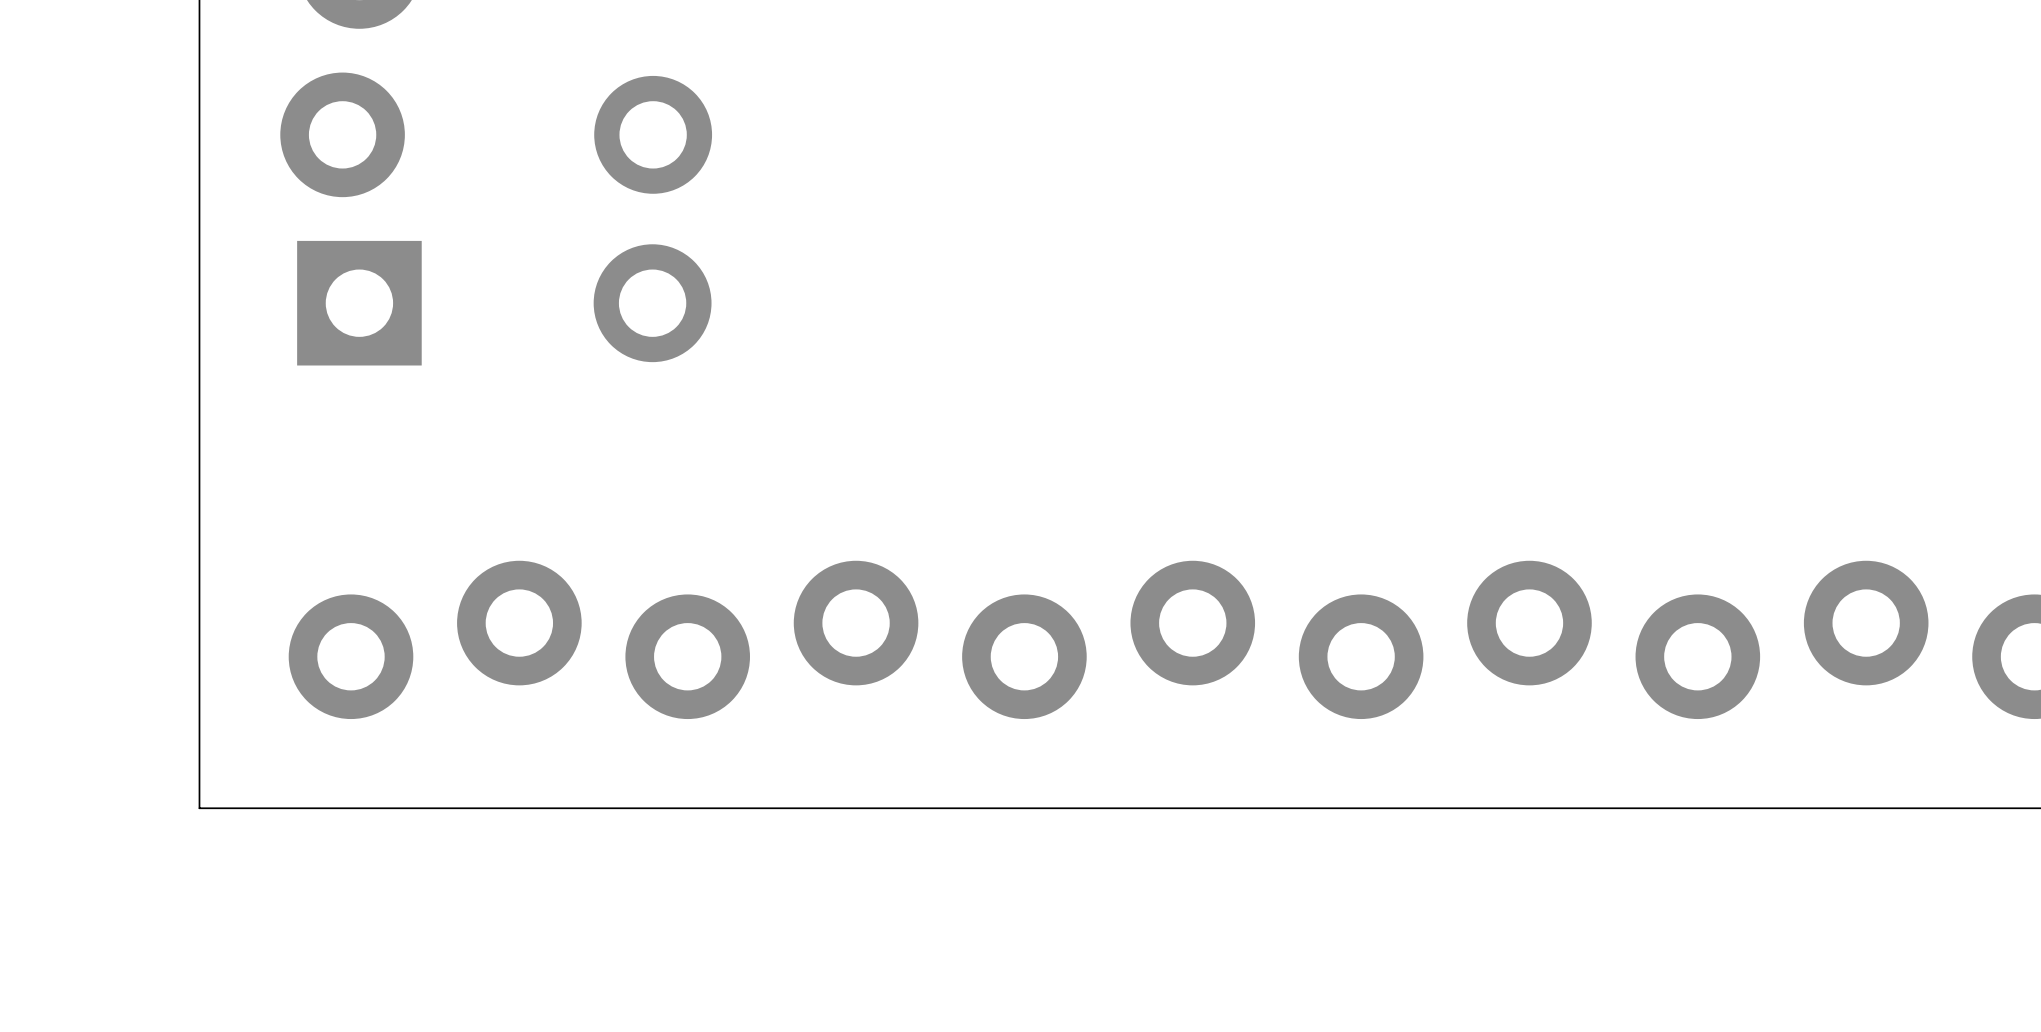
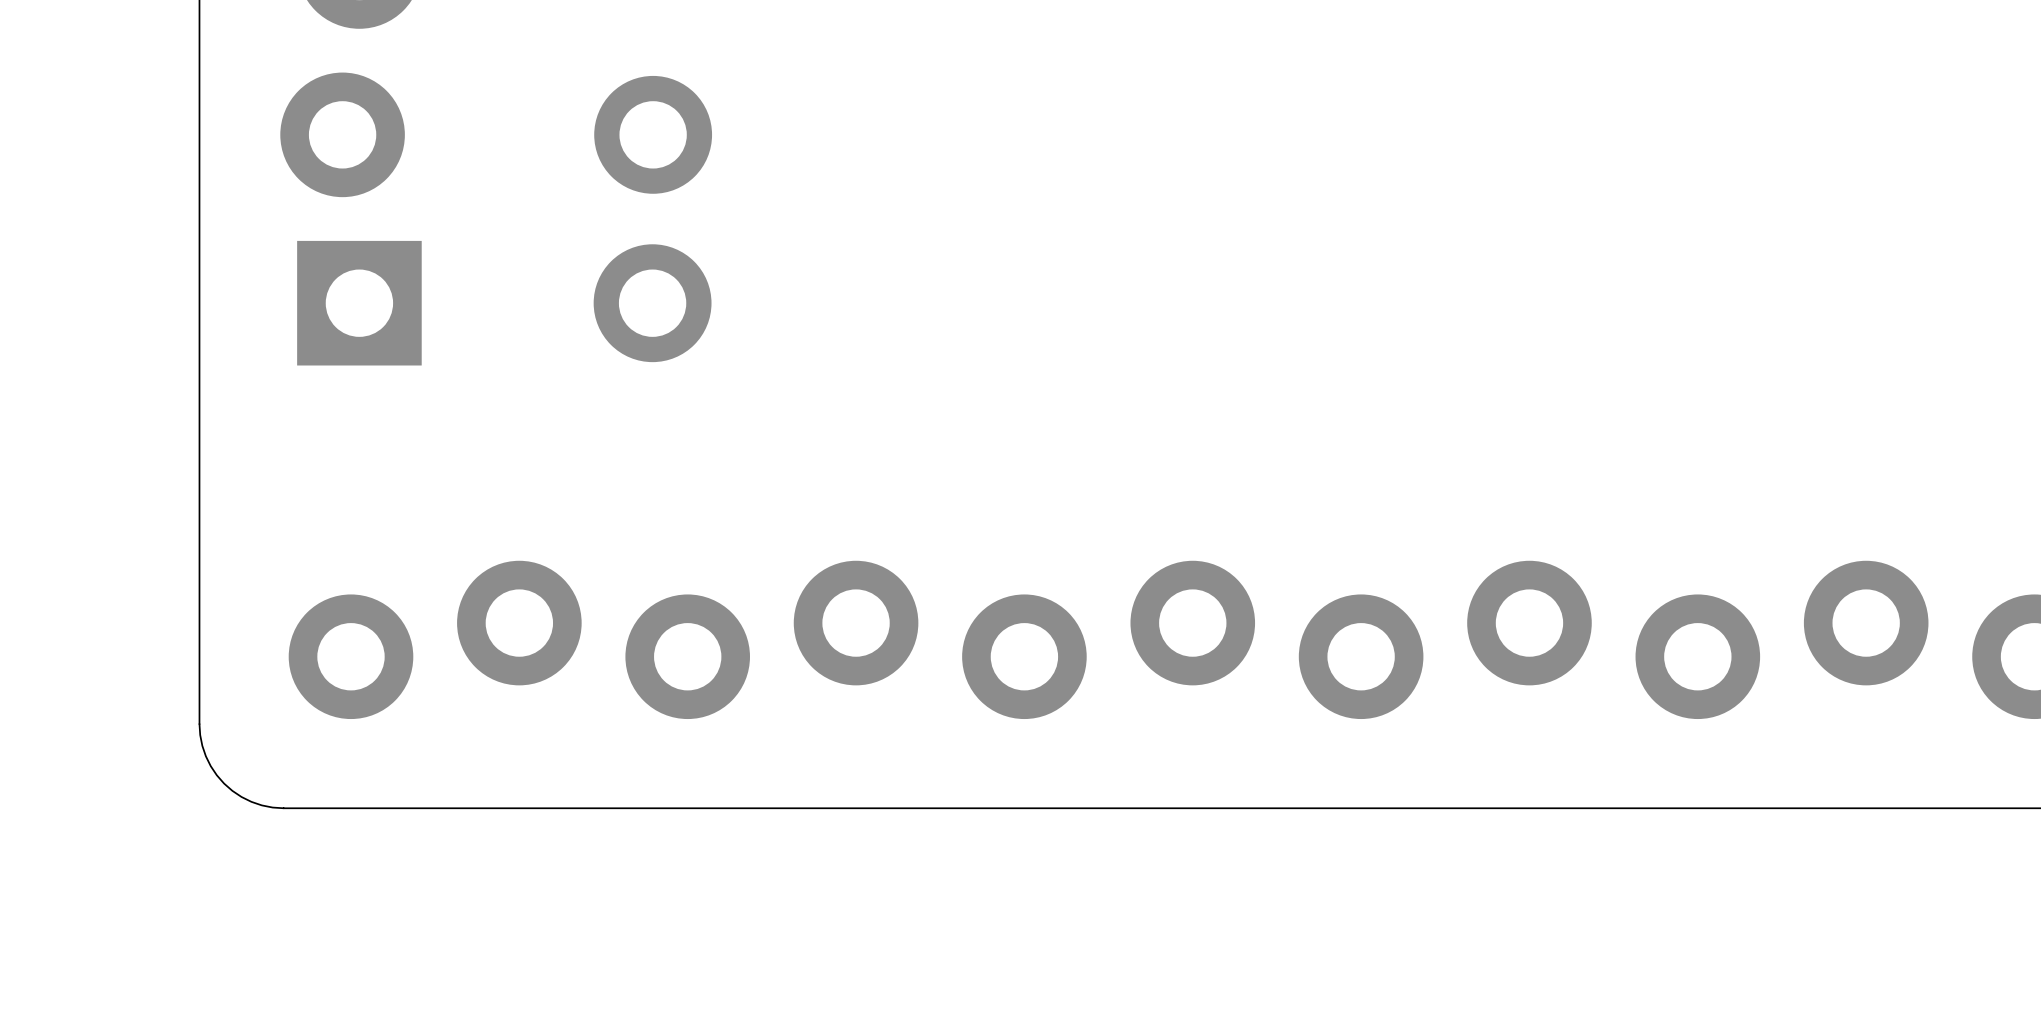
board edge: (199, 724) (199, 808) (283, 808) -> (199, 724) (205, 756) (224, 783) (251, 801) (283, 808)

